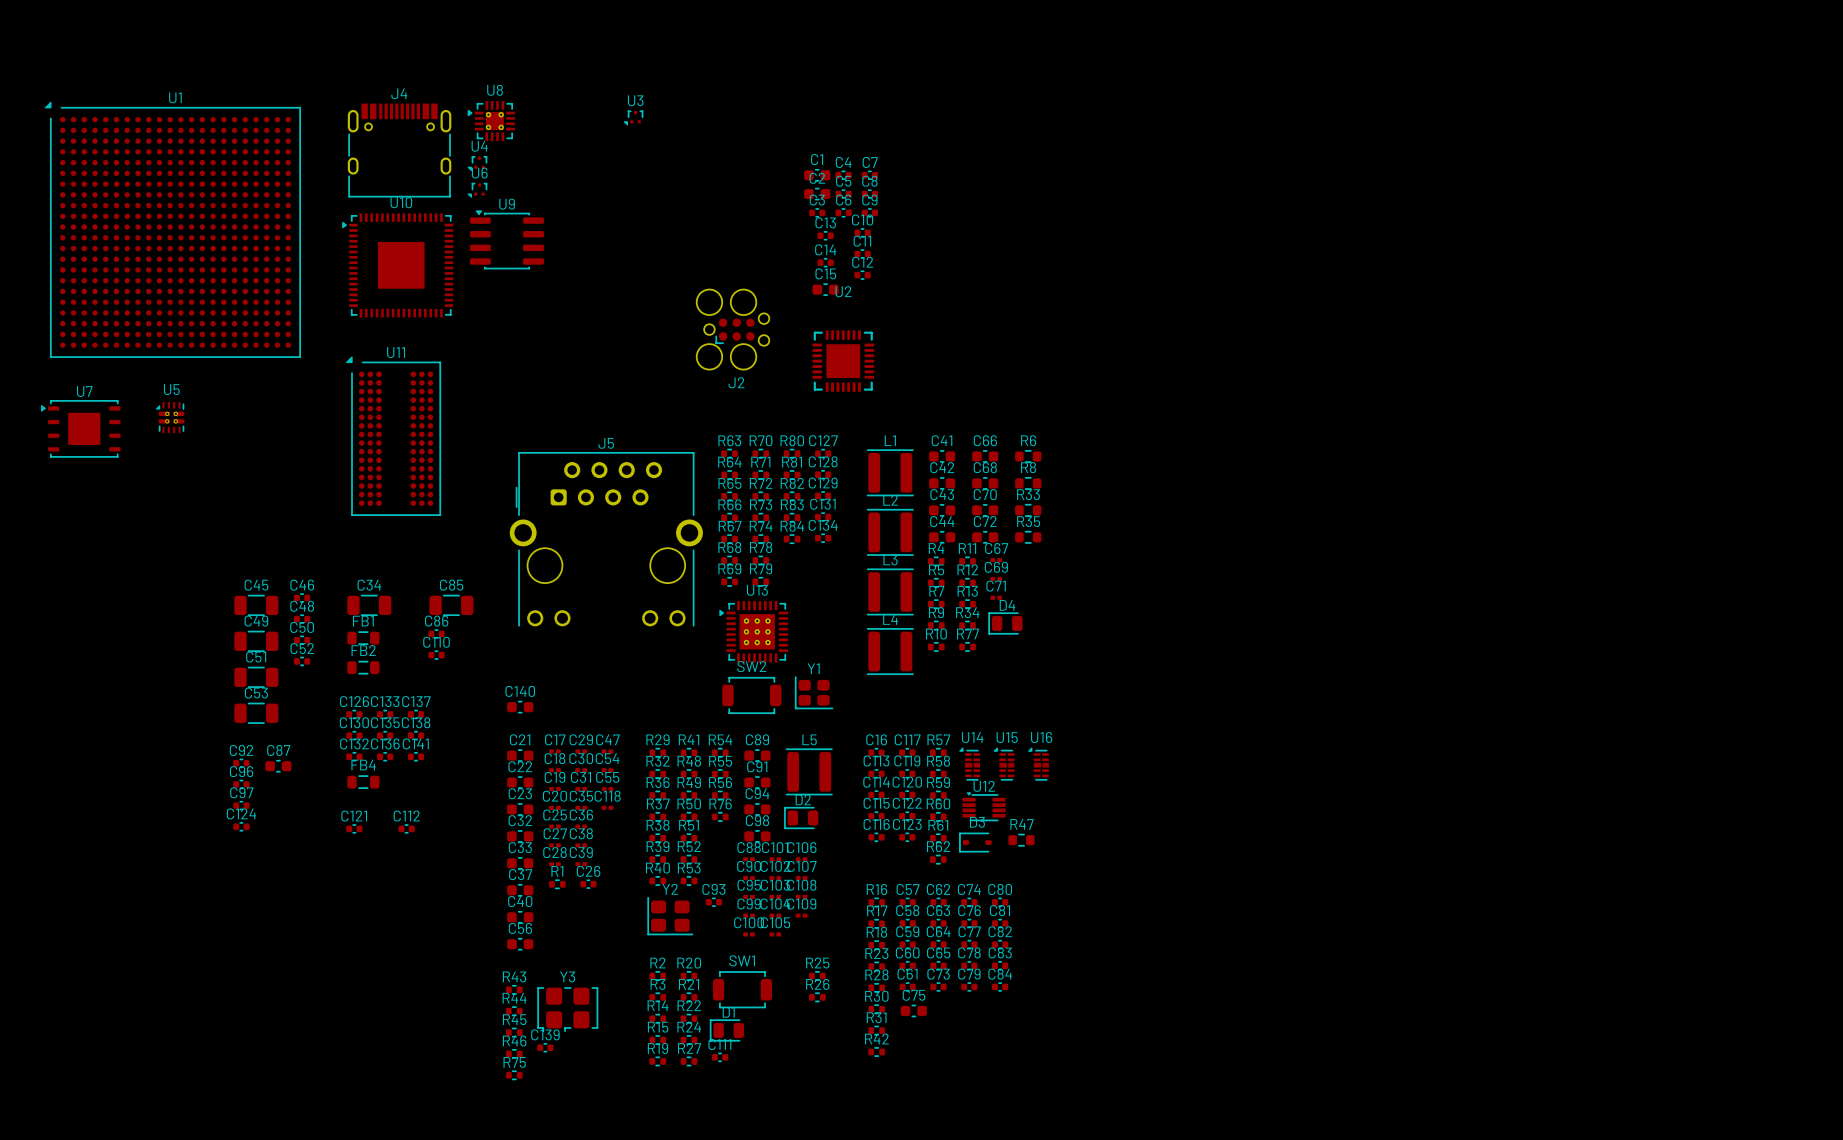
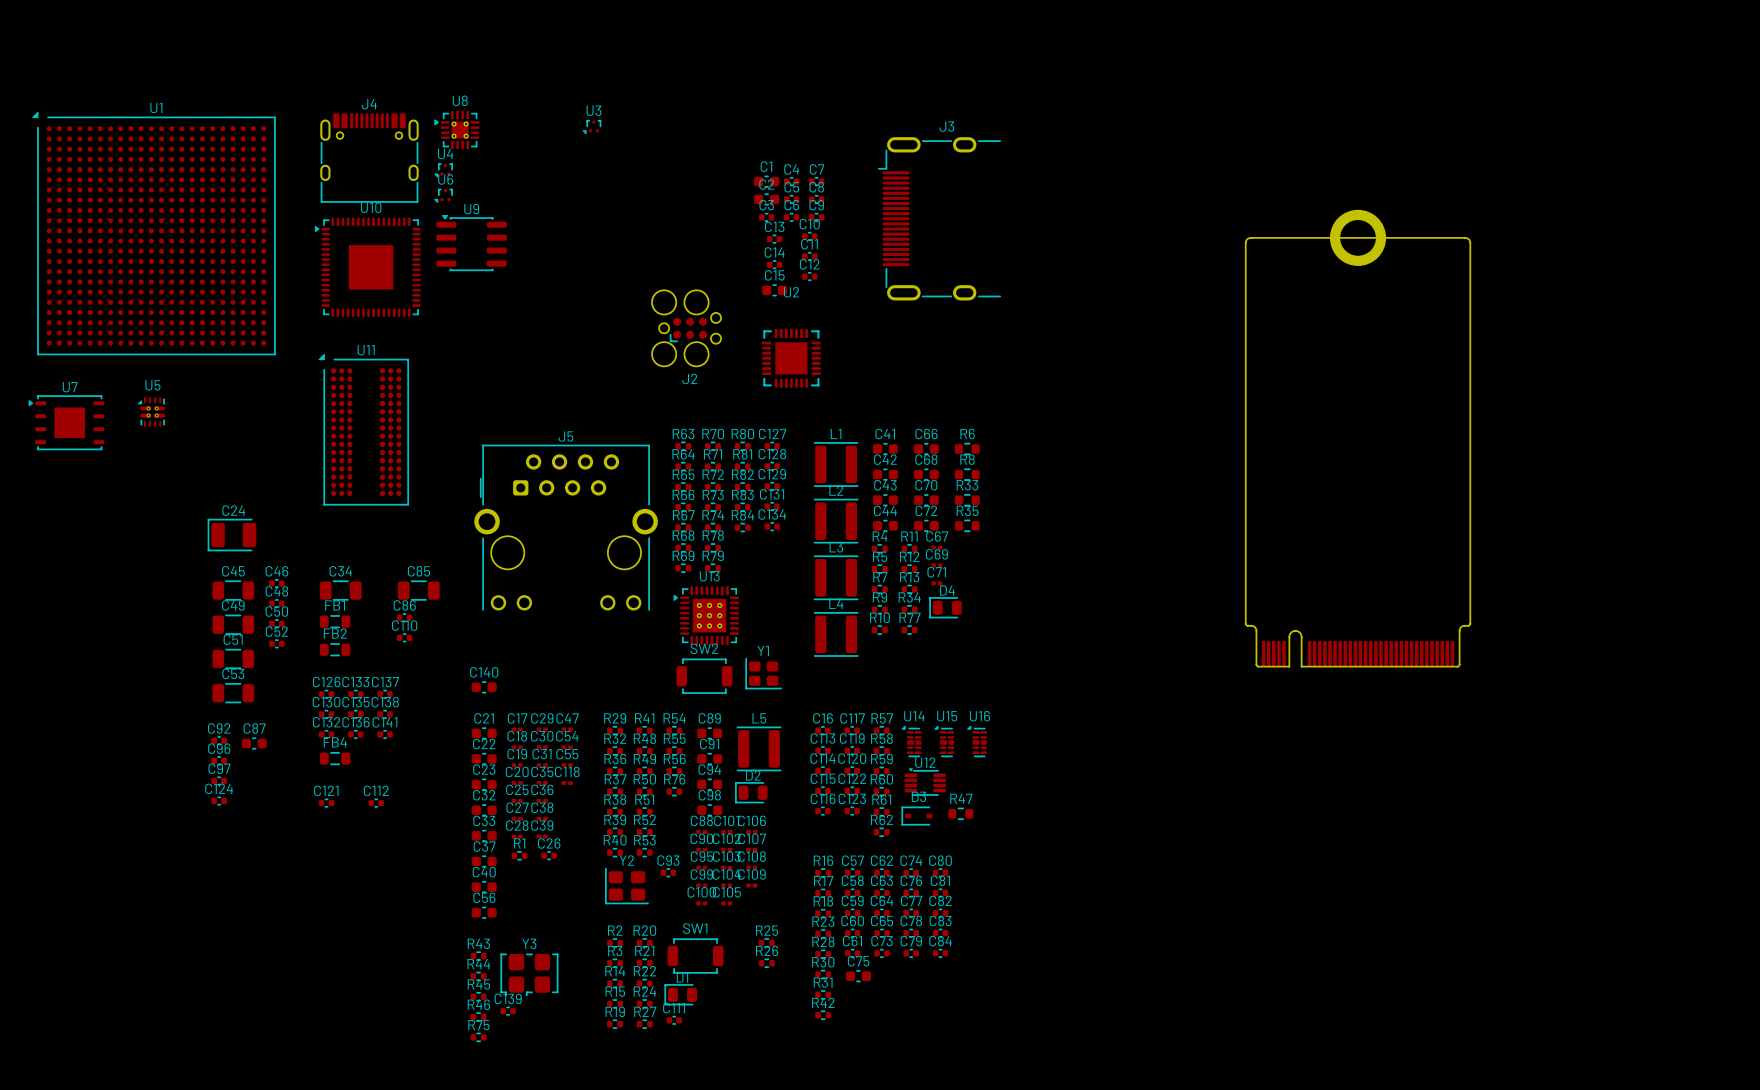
J3: none -> (939, 218)
part: none -> (1358, 438)
C24: none -> (232, 535)

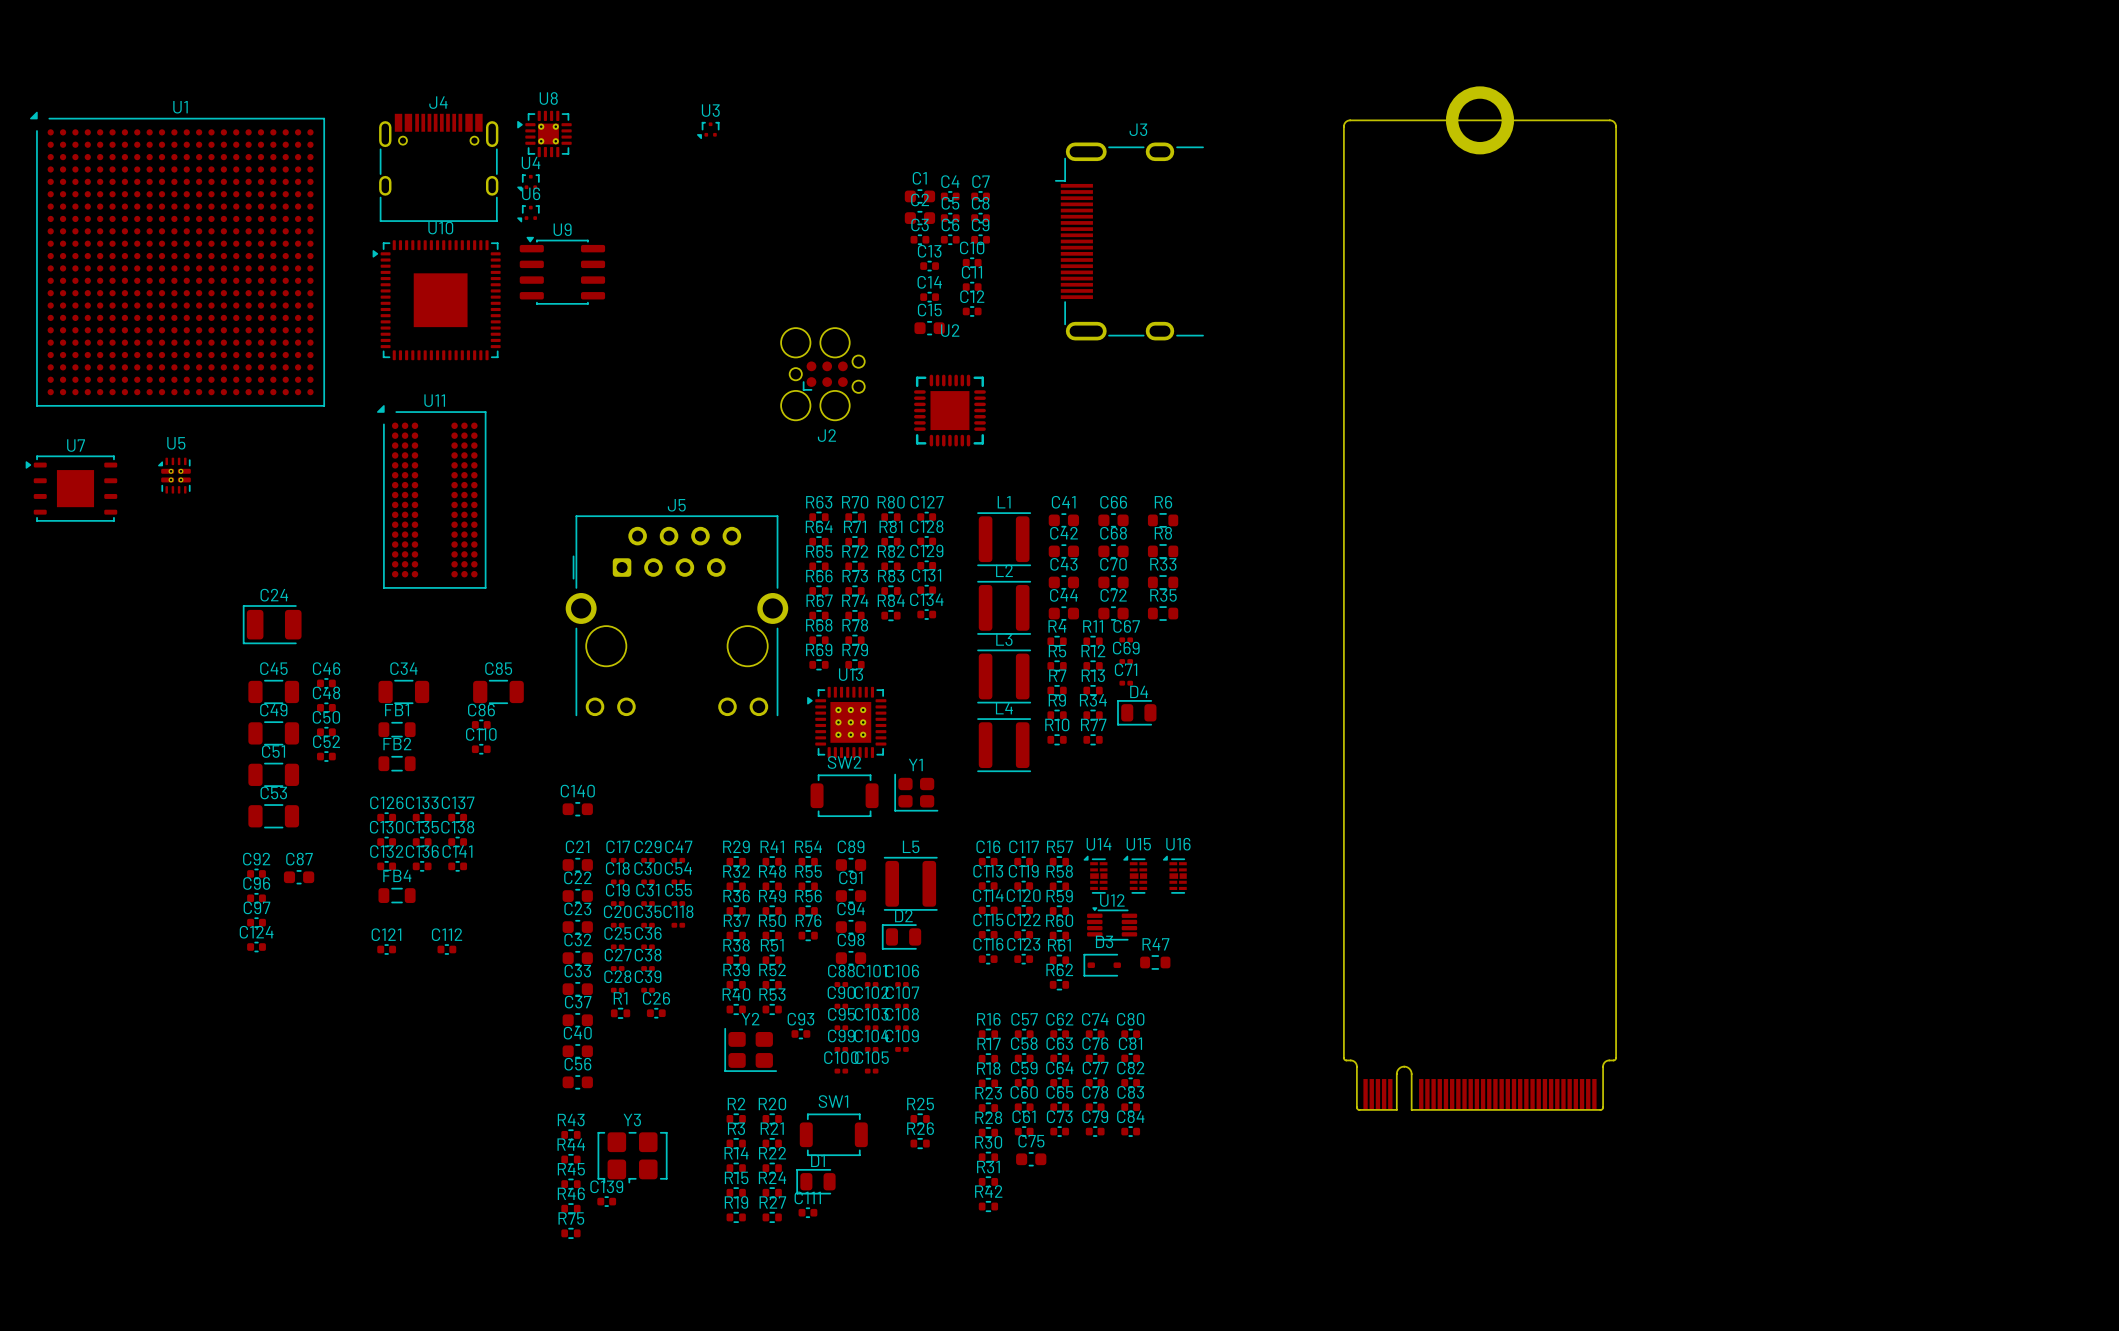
part: (1358, 438) -> none
part: none -> (1479, 598)

